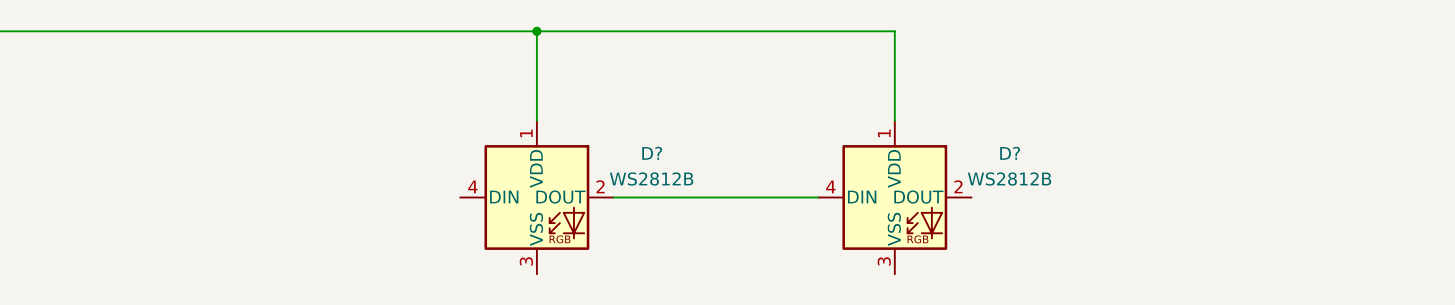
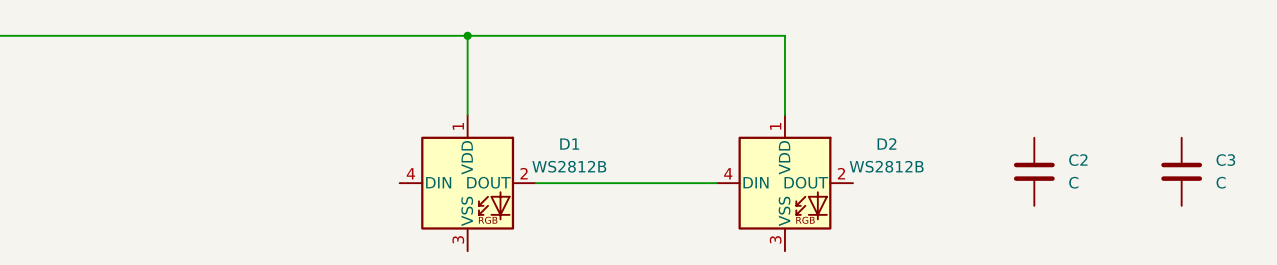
D? name: D? (652, 153) -> D1 (569, 144)
D? name: D? (1010, 153) -> D2 (886, 143)
C2: none -> C (1034, 171)
C3: none -> C (1181, 171)

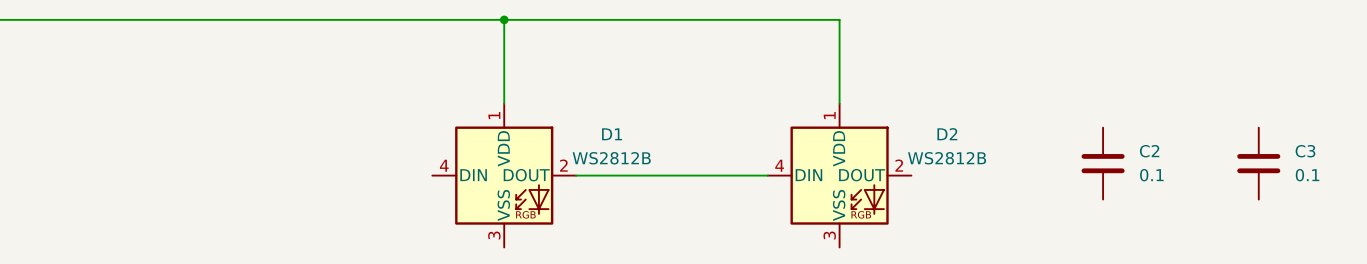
C2 value: C (1073, 182) -> 0.1 (1151, 175)
C3 value: C (1221, 182) -> 0.1 (1307, 175)

